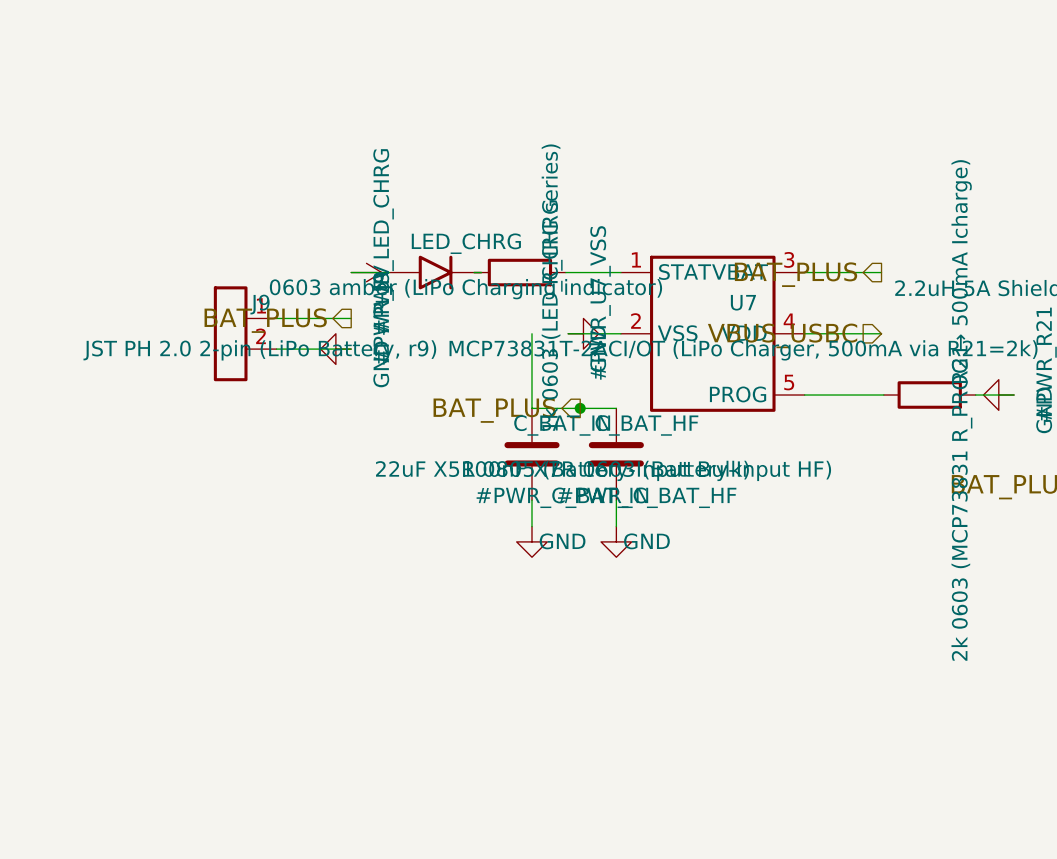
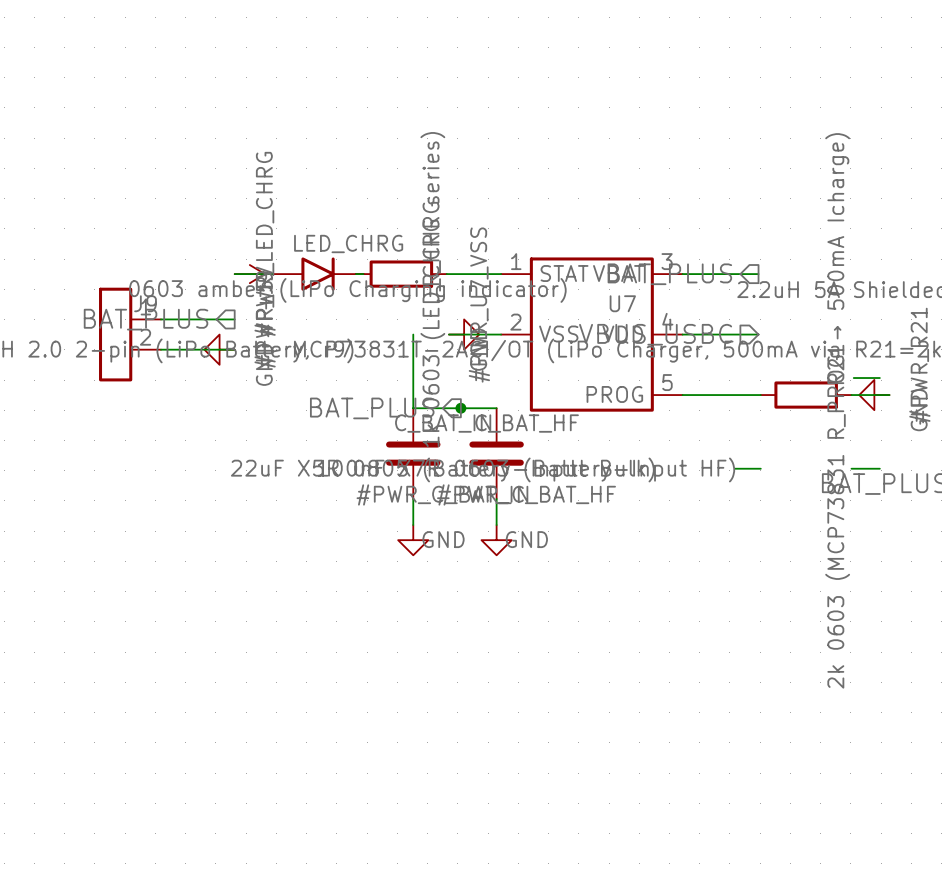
wire: none -> (853, 378) (879, 378)
wire: none -> (734, 468) (760, 468)
wire: none -> (851, 468) (879, 468)

